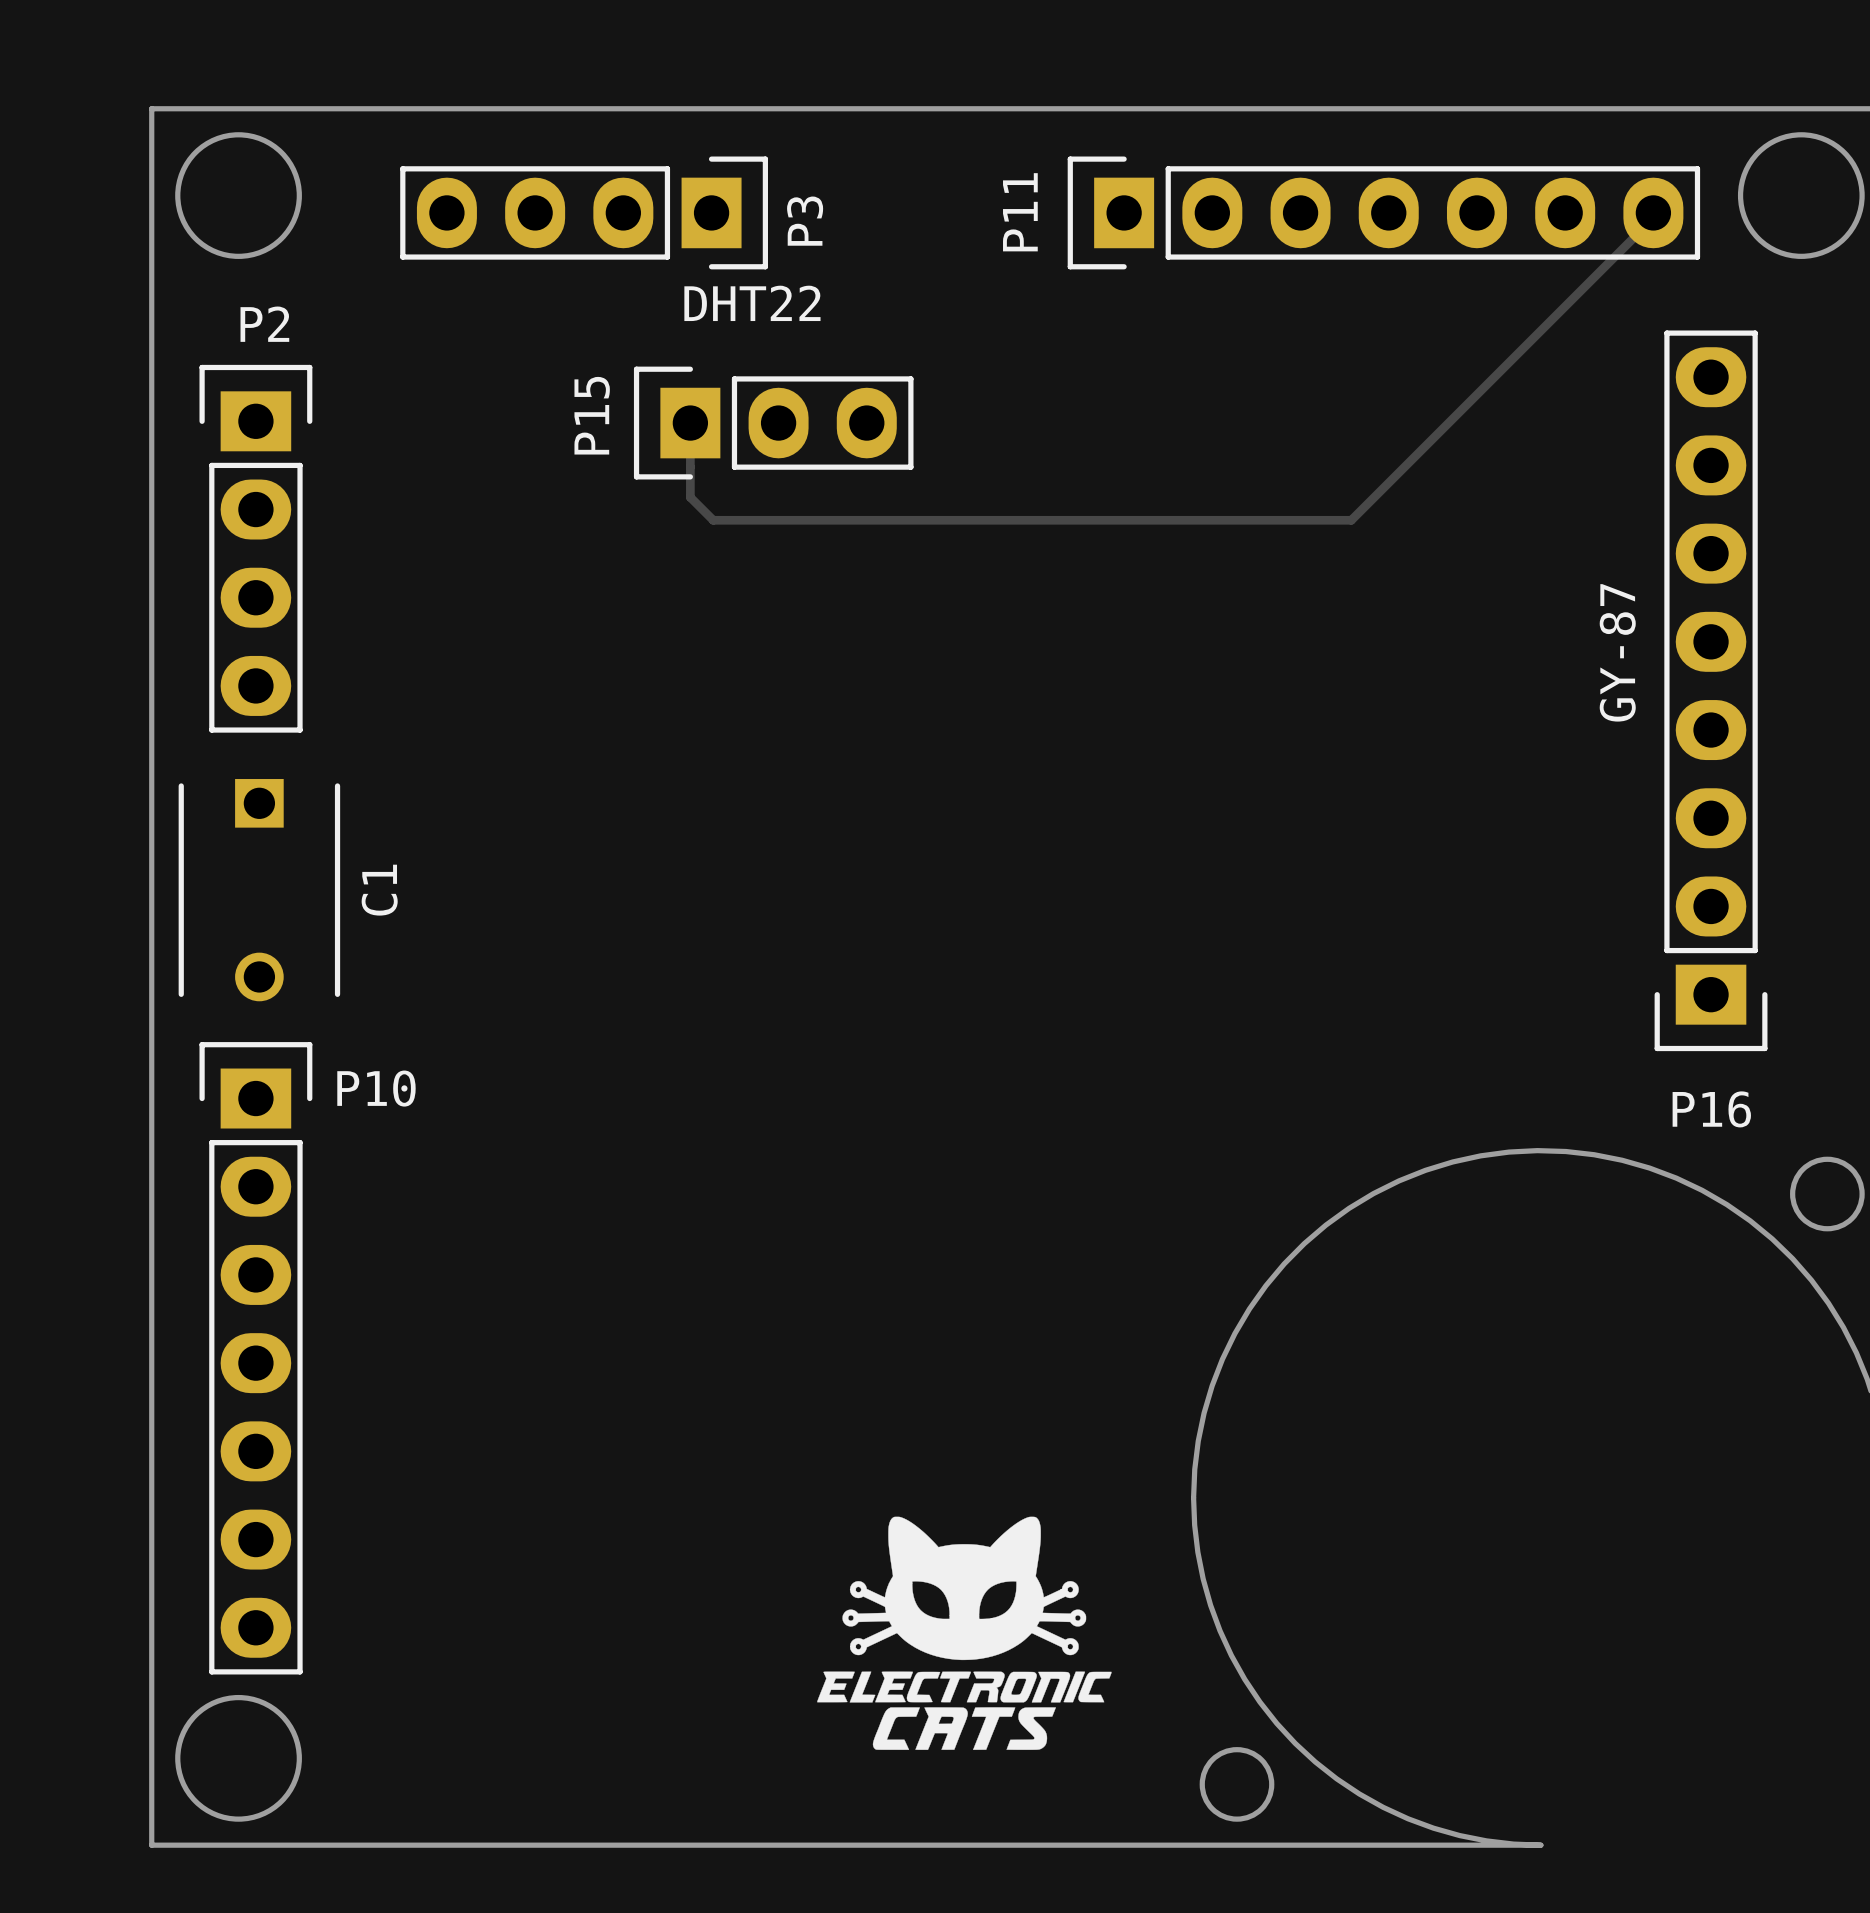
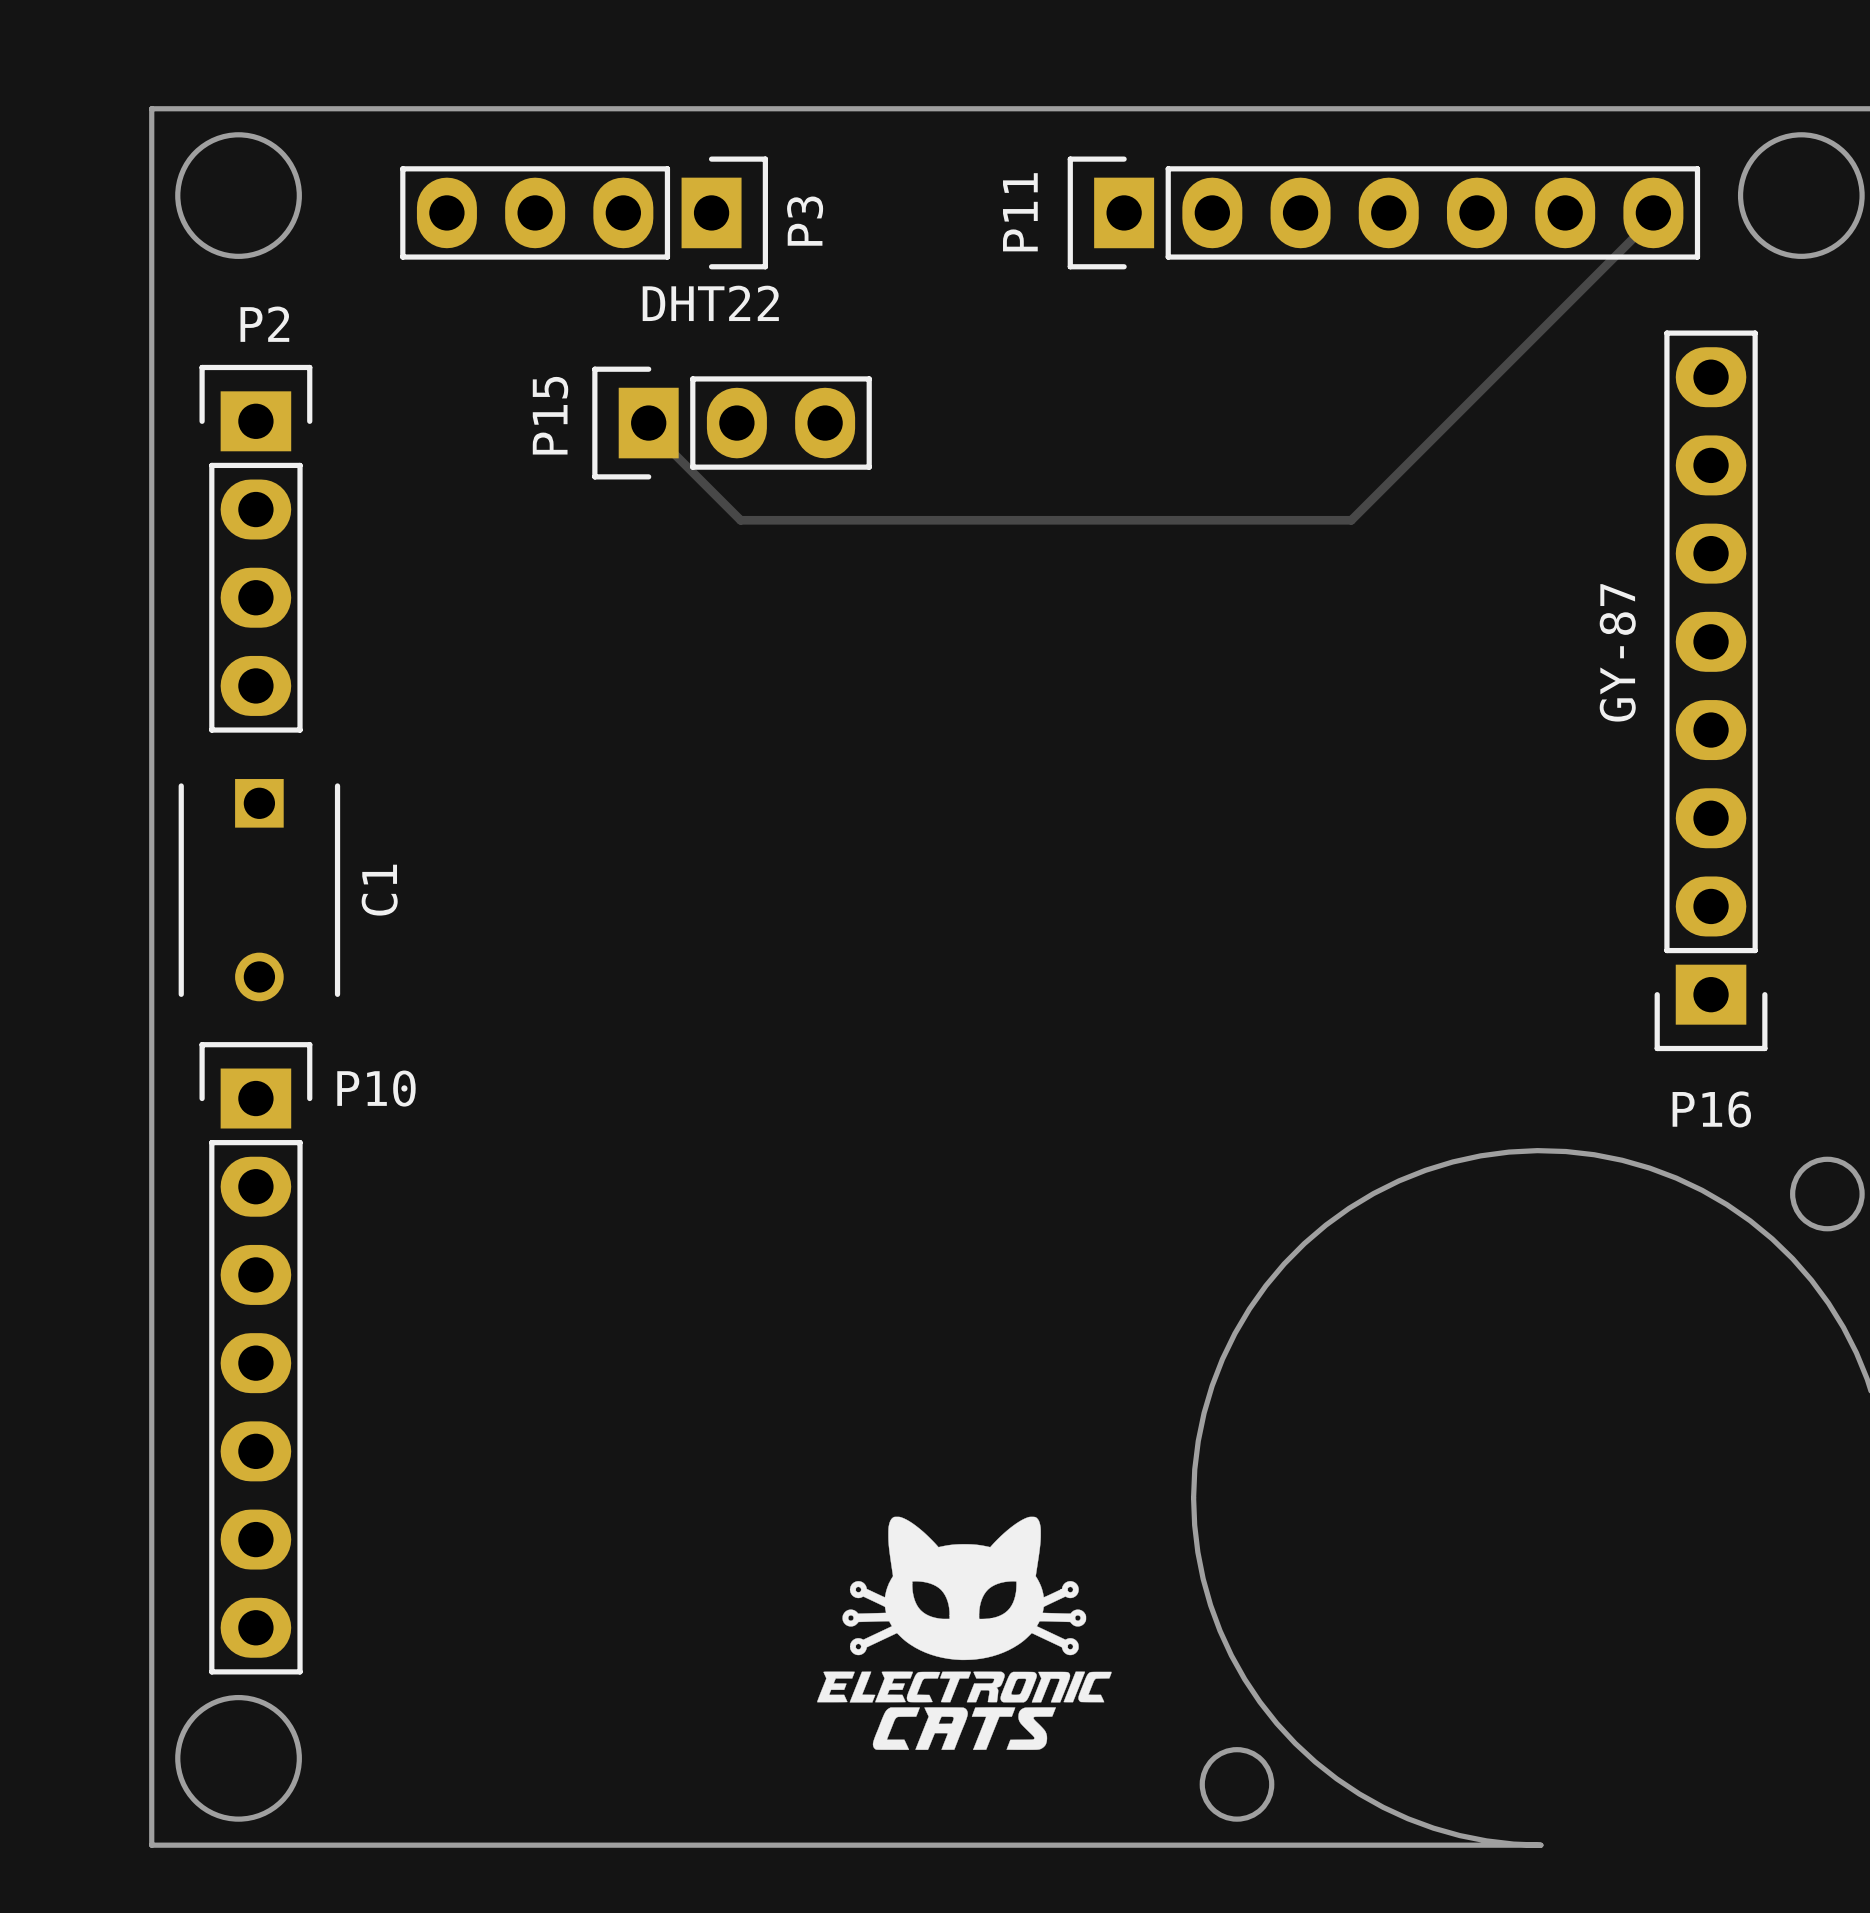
track: (690, 423) (690, 497) (713, 520) (740, 520) -> (648, 423) (648, 428) (740, 520)
P15 position: (773, 423) -> (732, 423)

